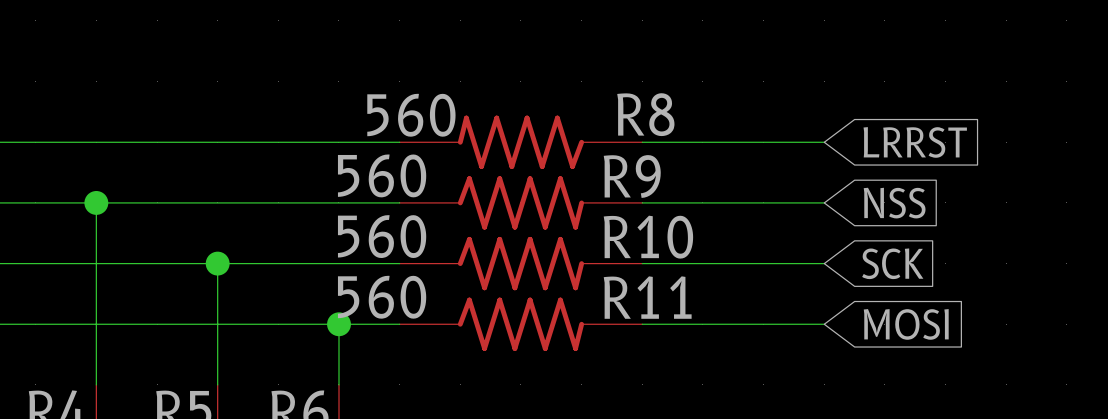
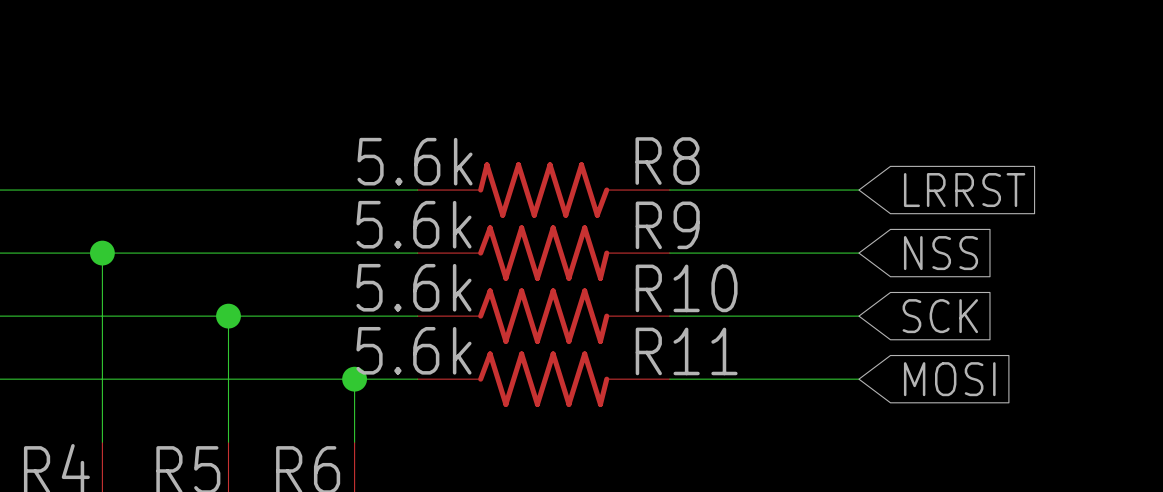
R8 value: 560 (411, 115) -> 5.6k (414, 161)
R9 value: 560 (382, 175) -> 5.6k (413, 224)
R10 value: 560 (382, 236) -> 5.6k (413, 287)
R11 value: 560 (382, 297) -> 5.6k (413, 350)

